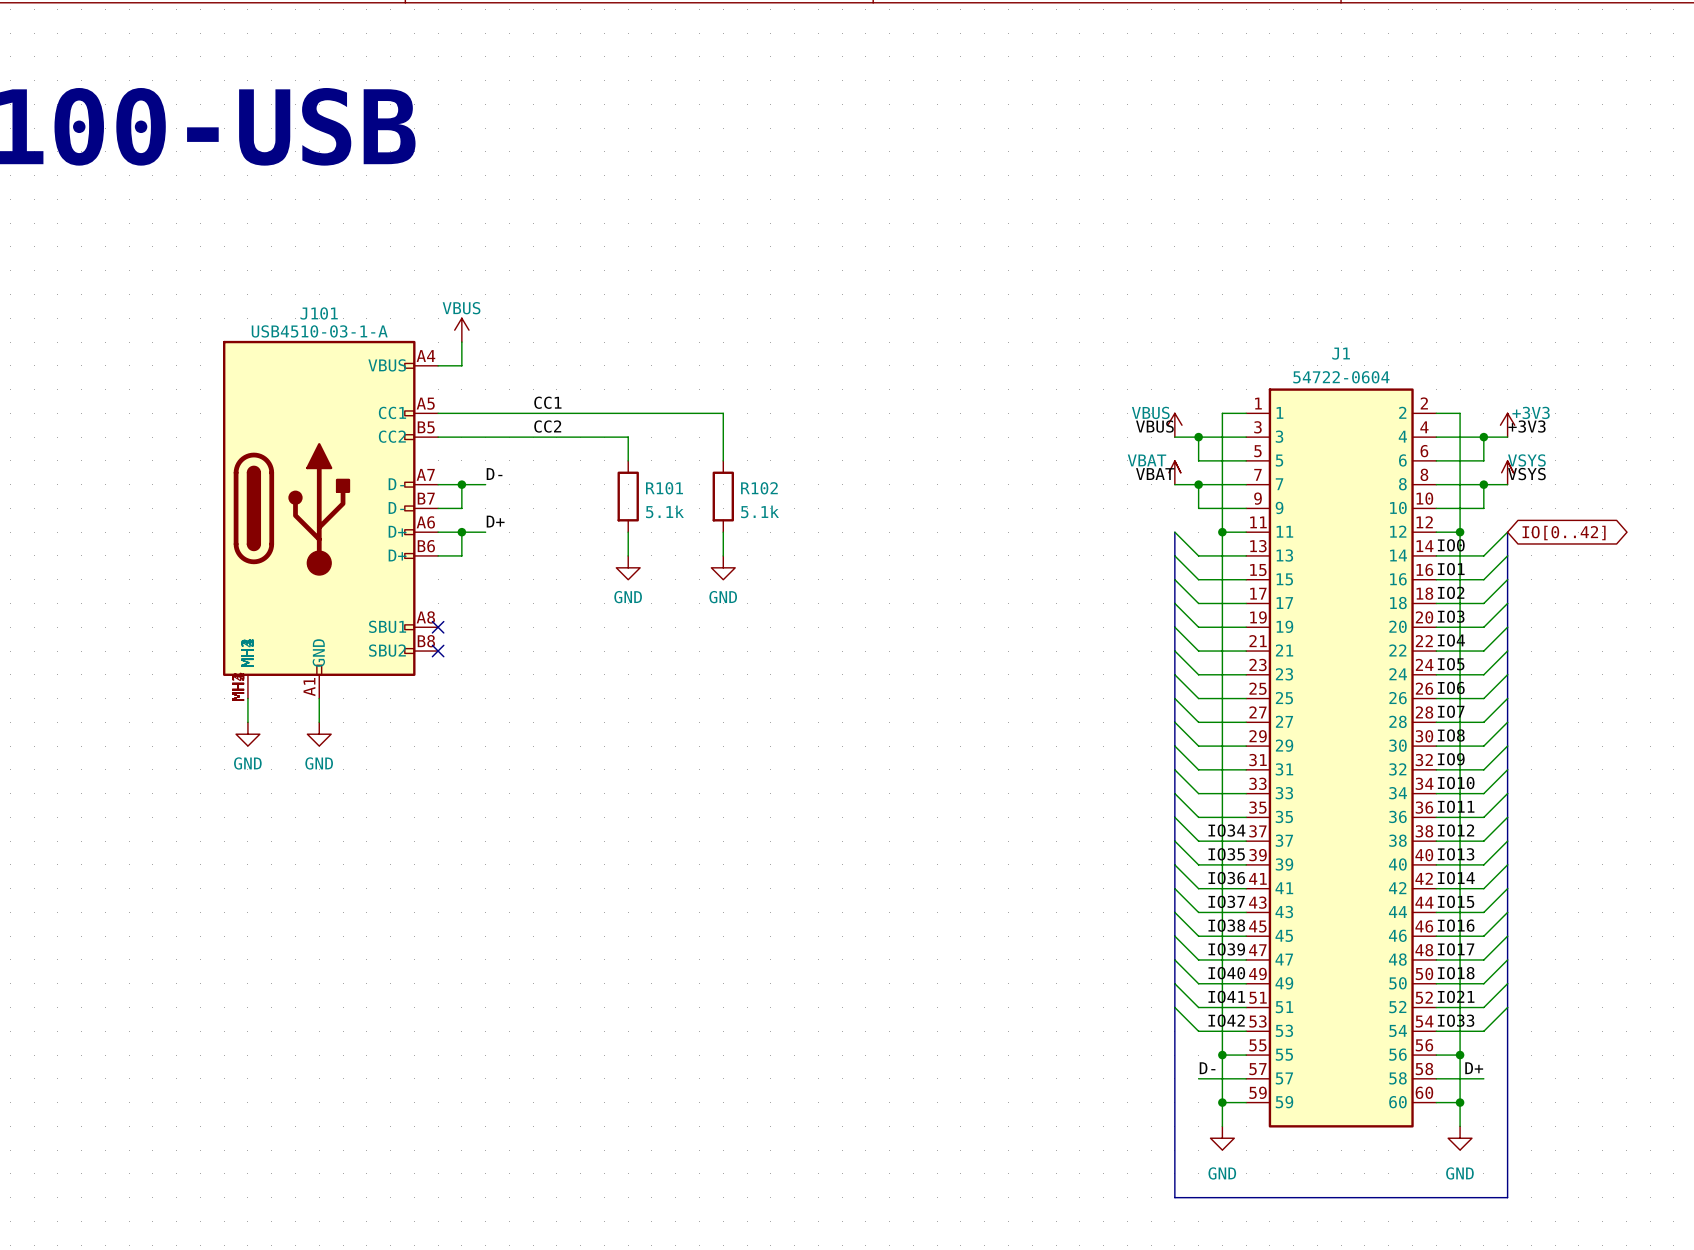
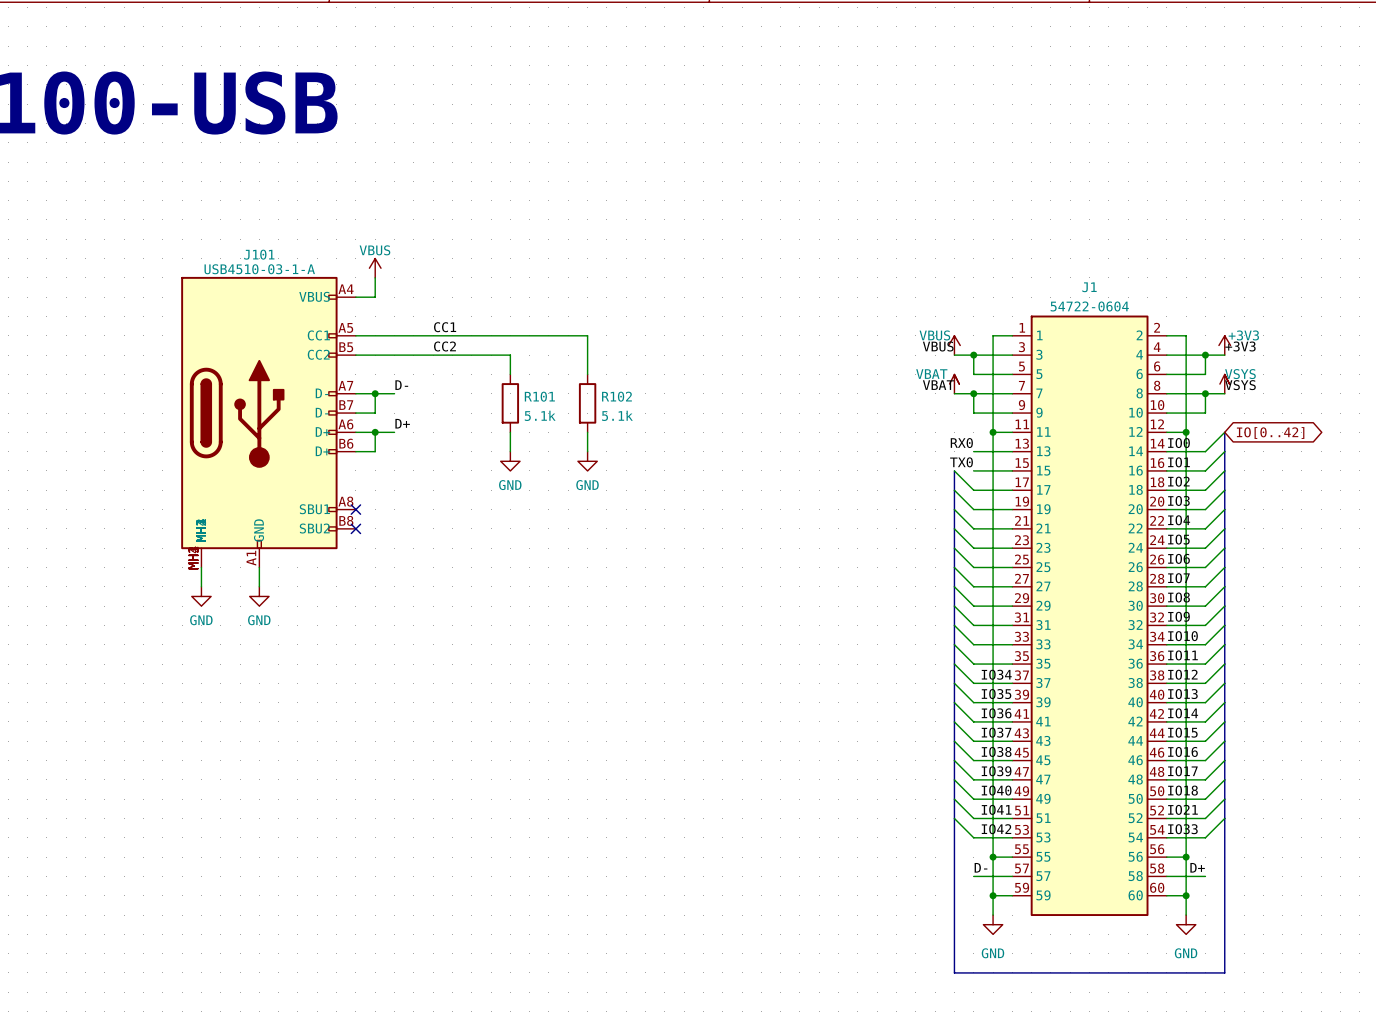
wire: (1174, 532) (1198, 555) -> none
bus: (1174, 532) (1174, 579) -> none
label: none -> RX0 (961, 443)
wire: (1174, 555) (1198, 579) -> none
label: none -> TX0 (961, 462)

